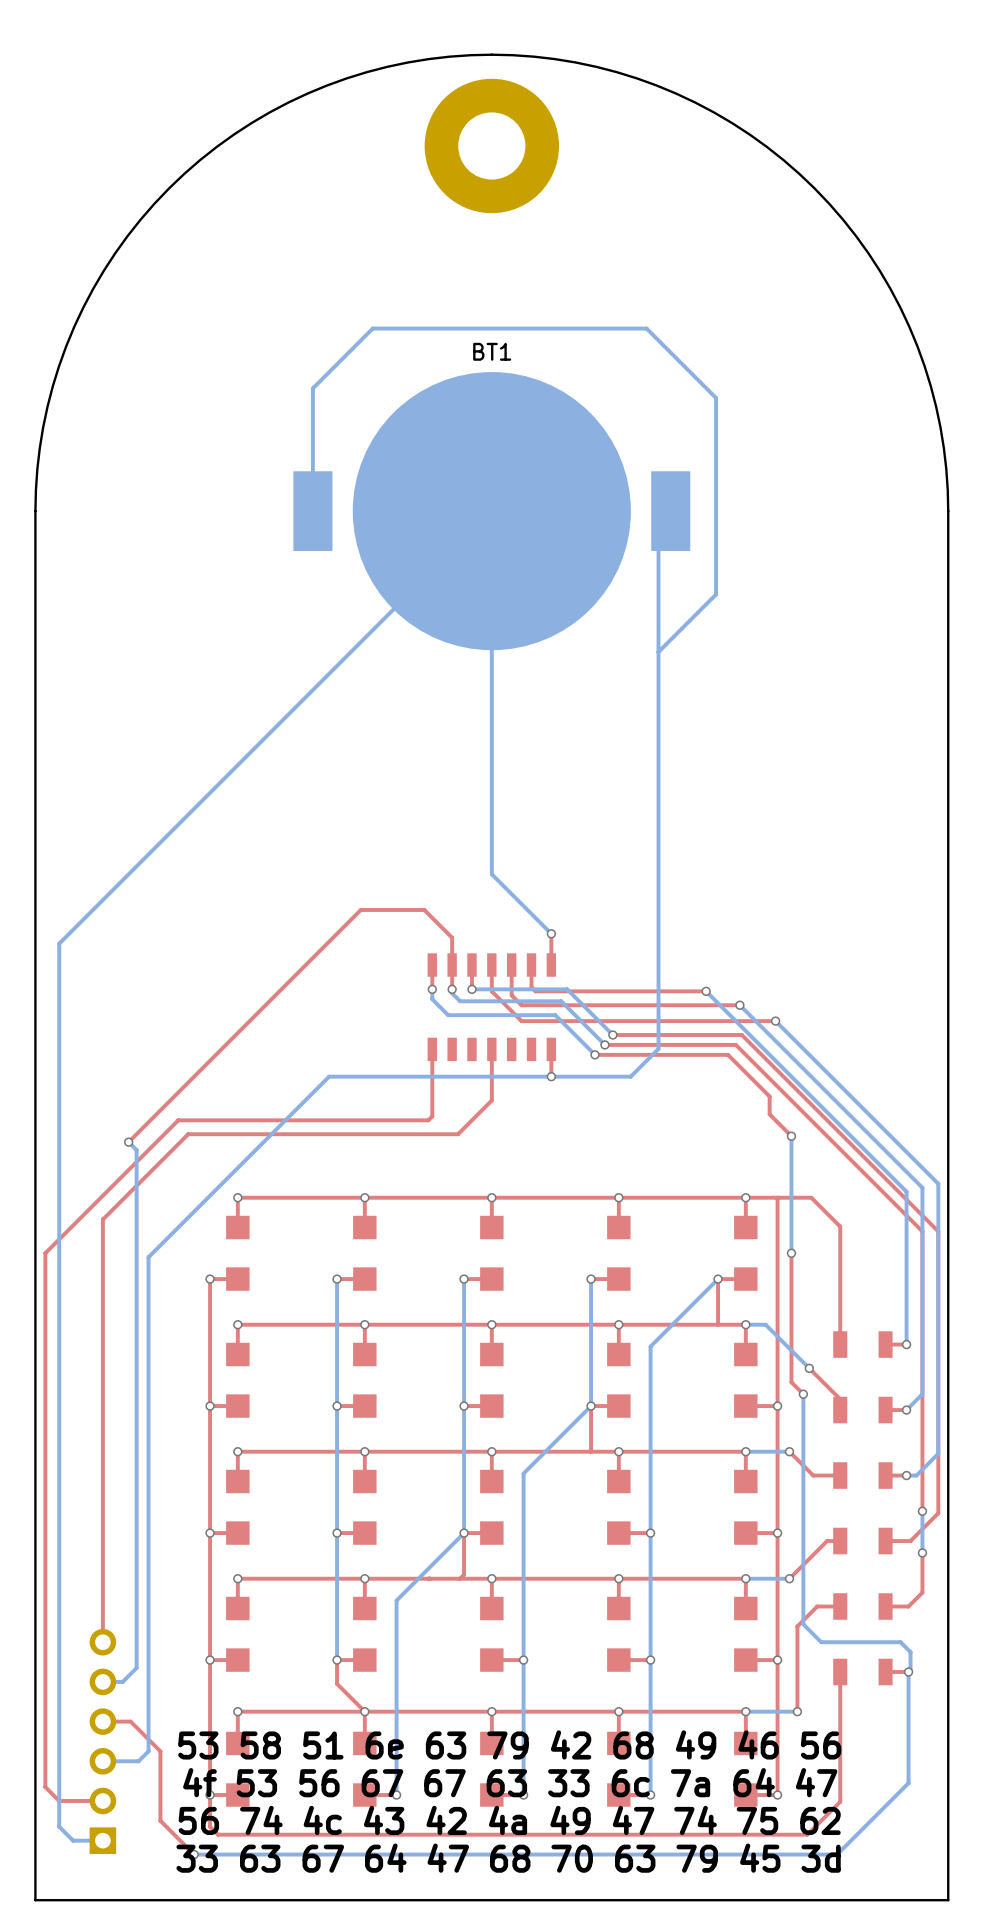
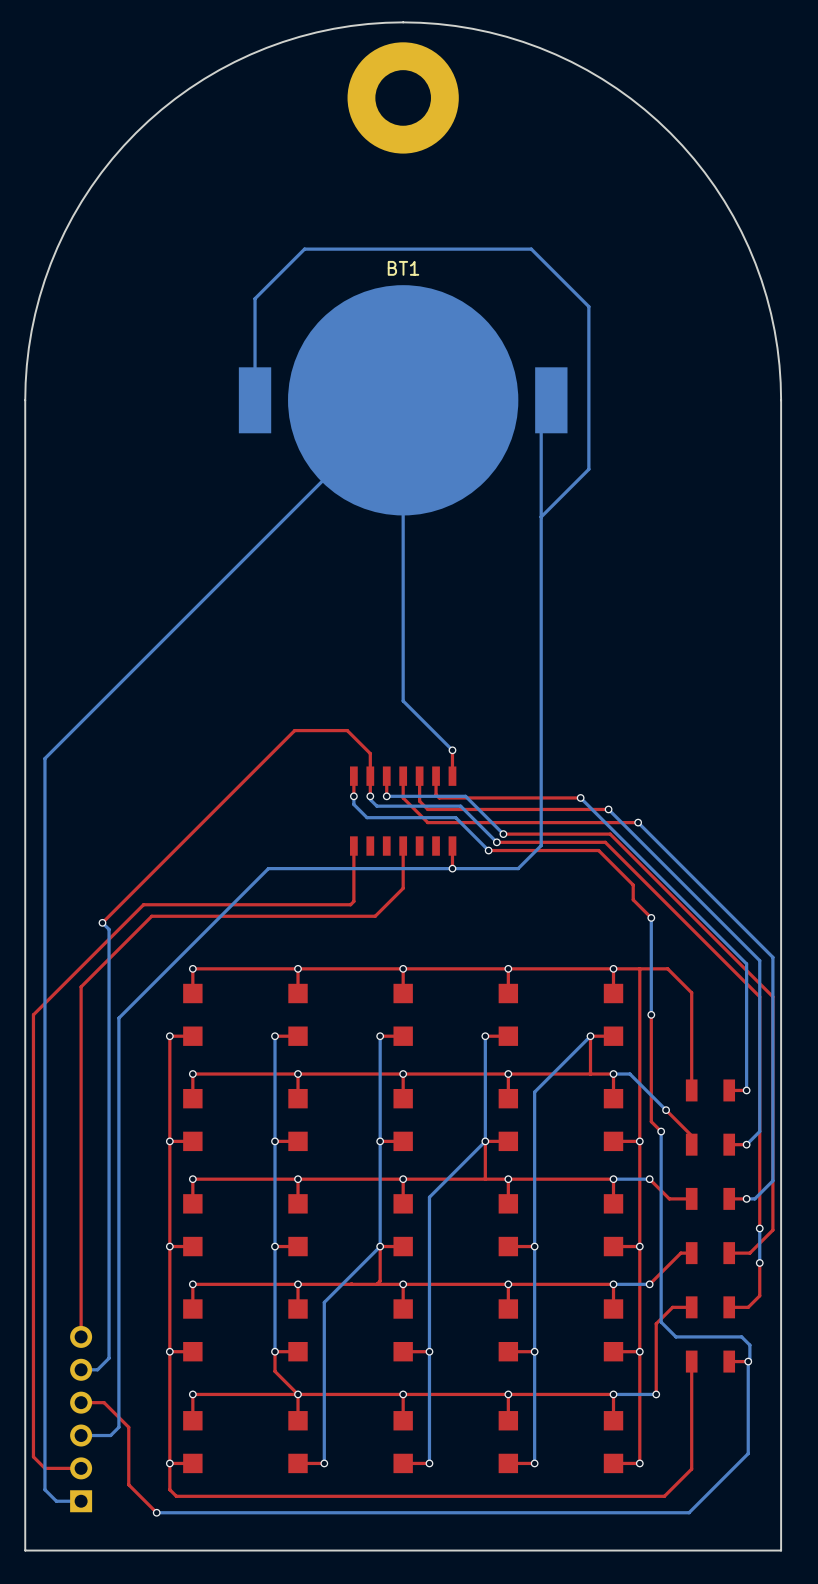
text: 53 58 51 6e 63 79 42 68 49 46 56 (509, 1744) -> none
text: 4f 53 56 67 67 63 33 6c 7a 64 47 (510, 1782) -> none
text: 56 74 4c 43 42 4a 49 47 74 75 62 (509, 1820) -> none
text: 33 63 67 64 47 68 70 63 79 45 3d (508, 1858) -> none

